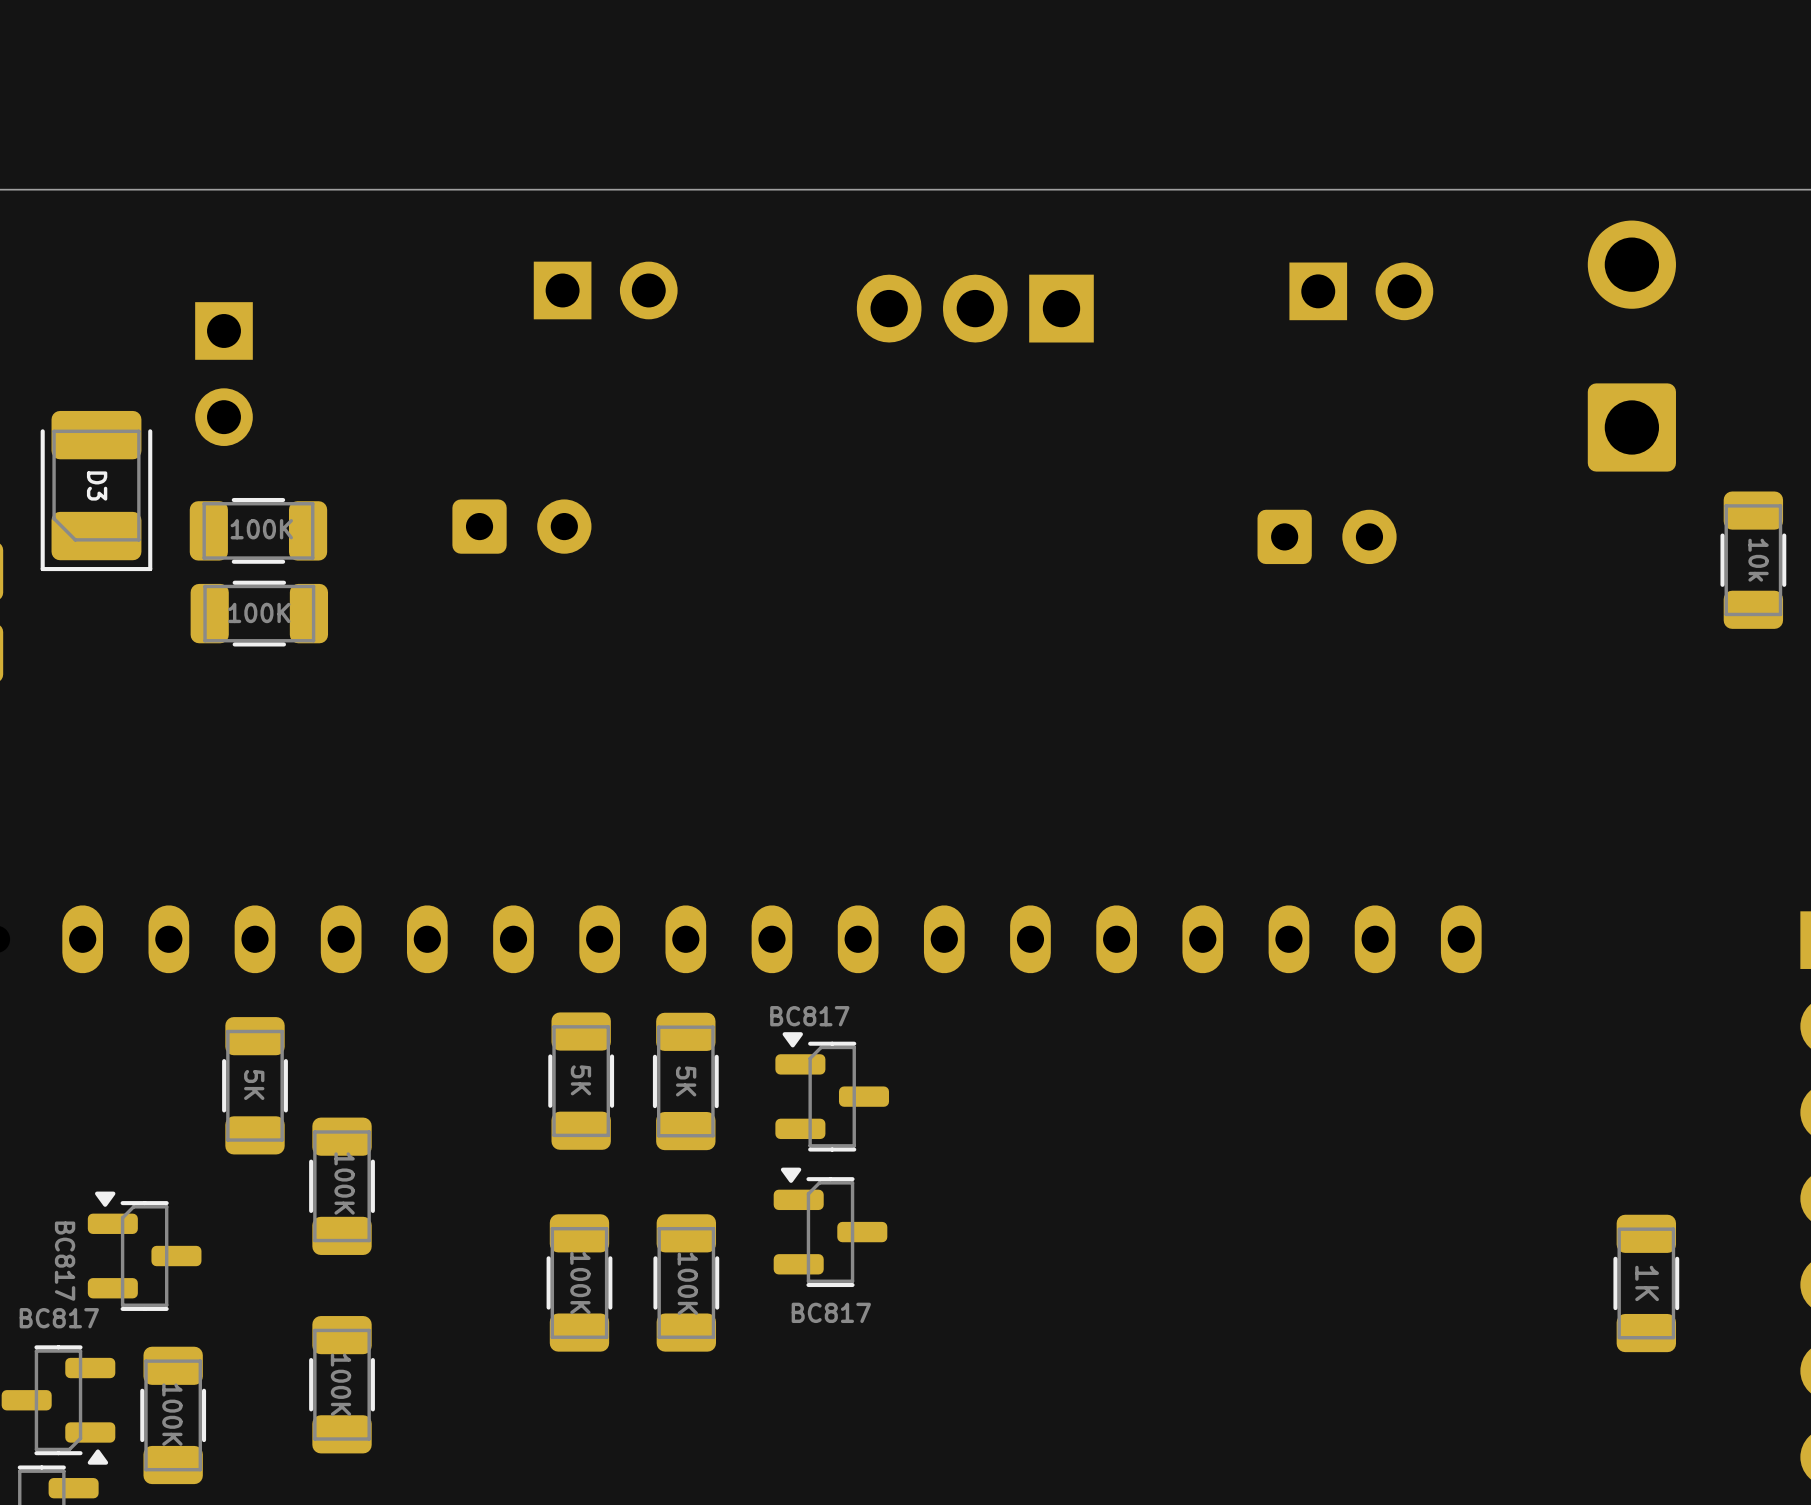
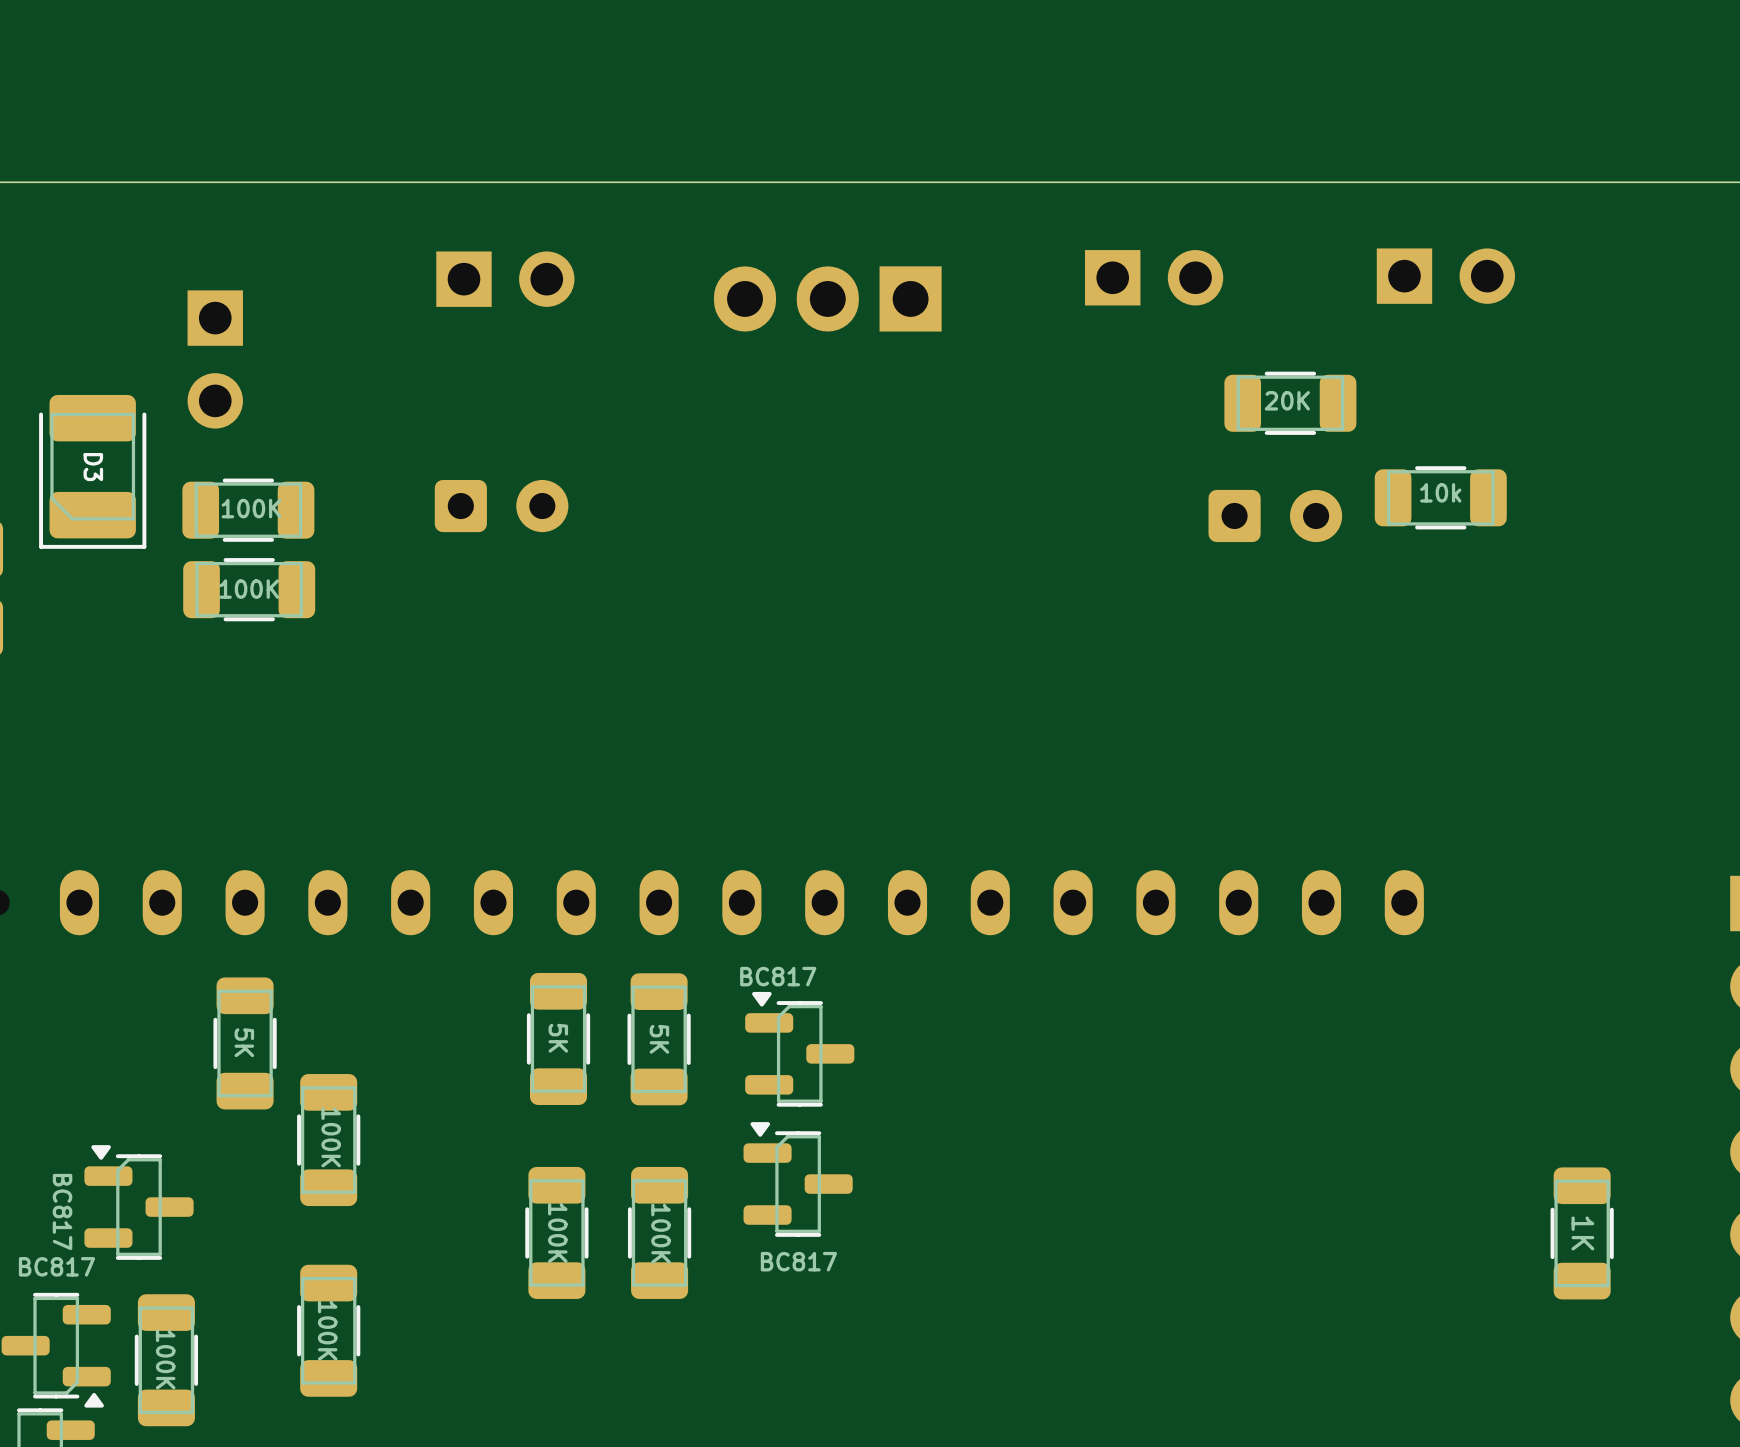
part: none -> (1445, 276)
part: none -> (1154, 277)
part position: (605, 290) -> (505, 279)
part: (1361, 291) -> none
part position: (975, 308) -> (827, 298)
part: (1631, 346) -> none
part: none -> 20K (1290, 403)
part rotation: 0° (1753, 560) -> 90° clockwise (1440, 497)
part position: (1753, 560) -> (1440, 497)

